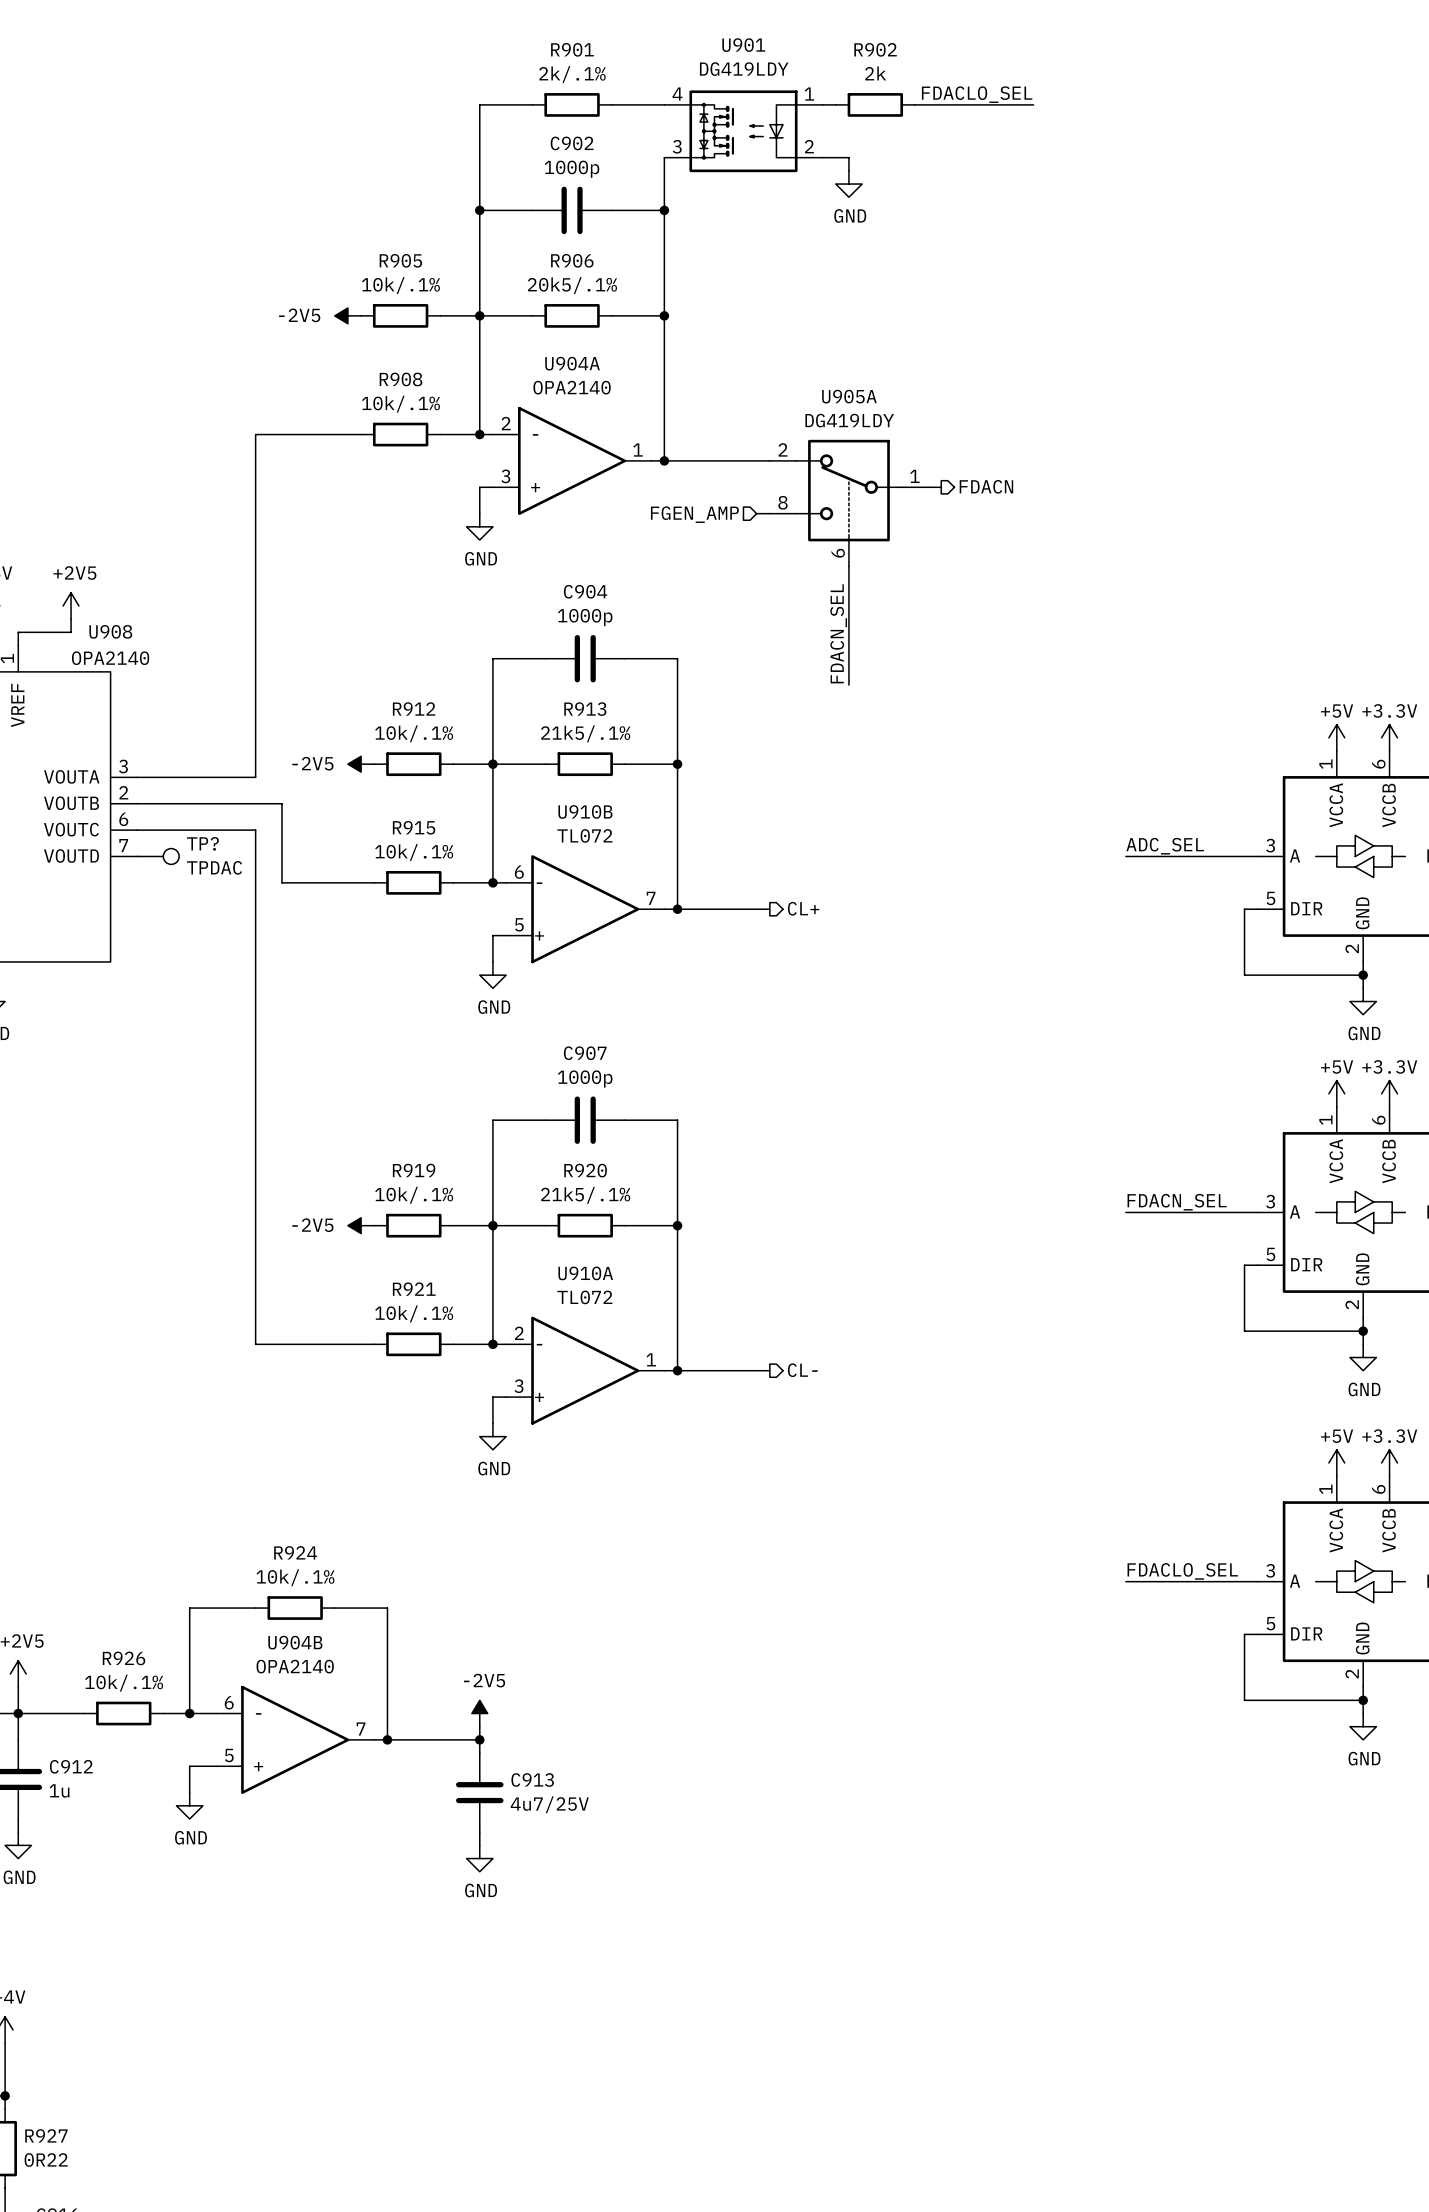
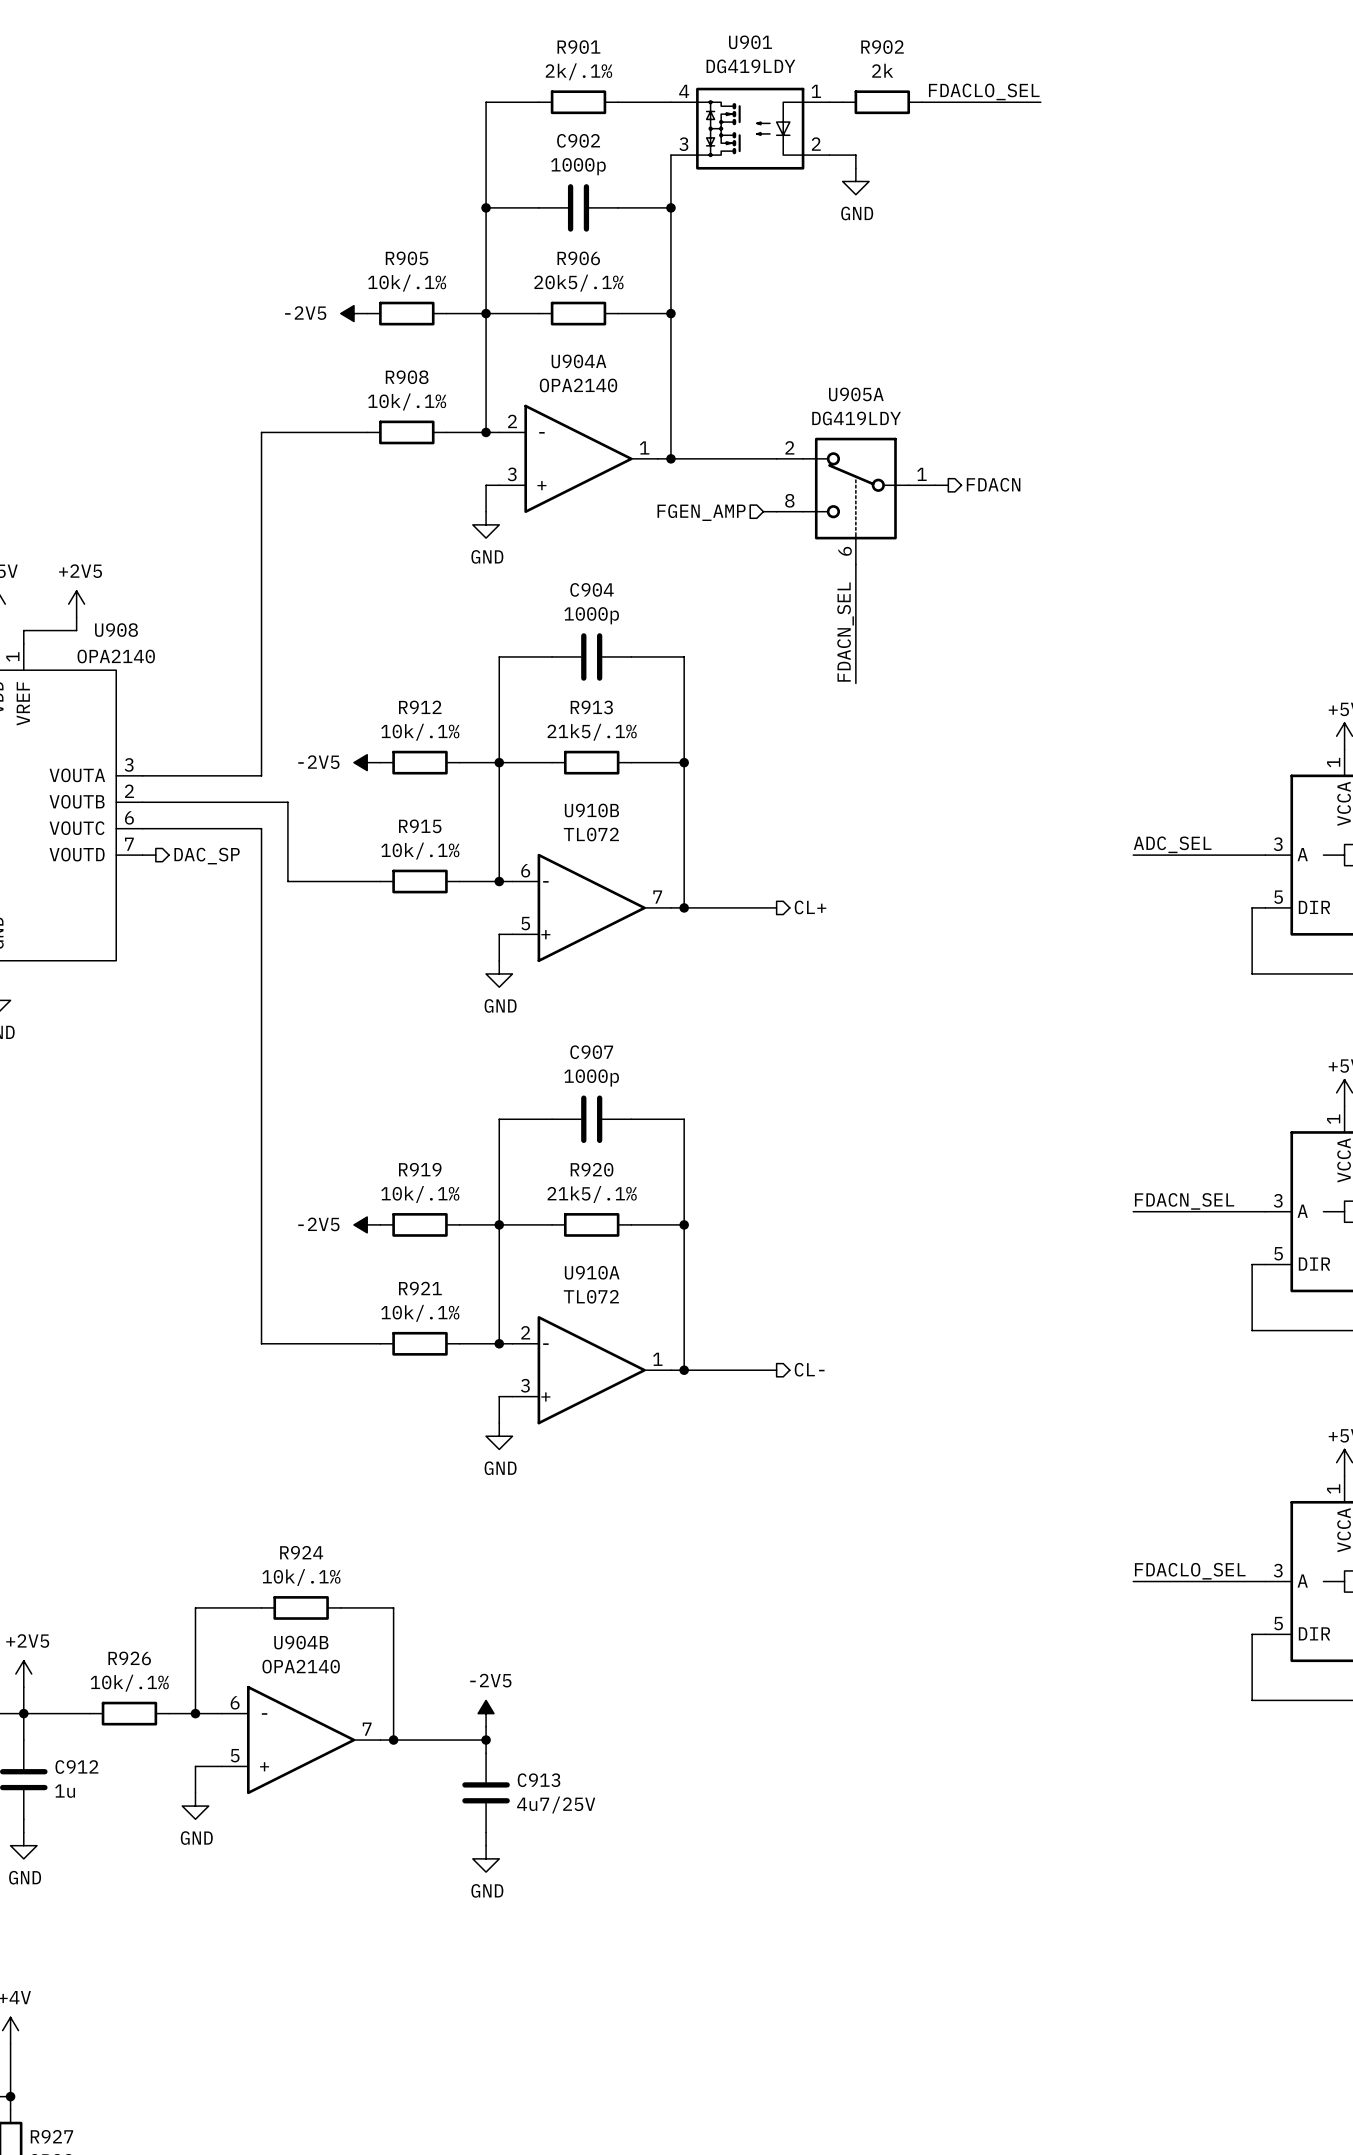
TP?: TPDAC (158, 856) -> none
hierarchical label: none -> DAC_SP (207, 856)

